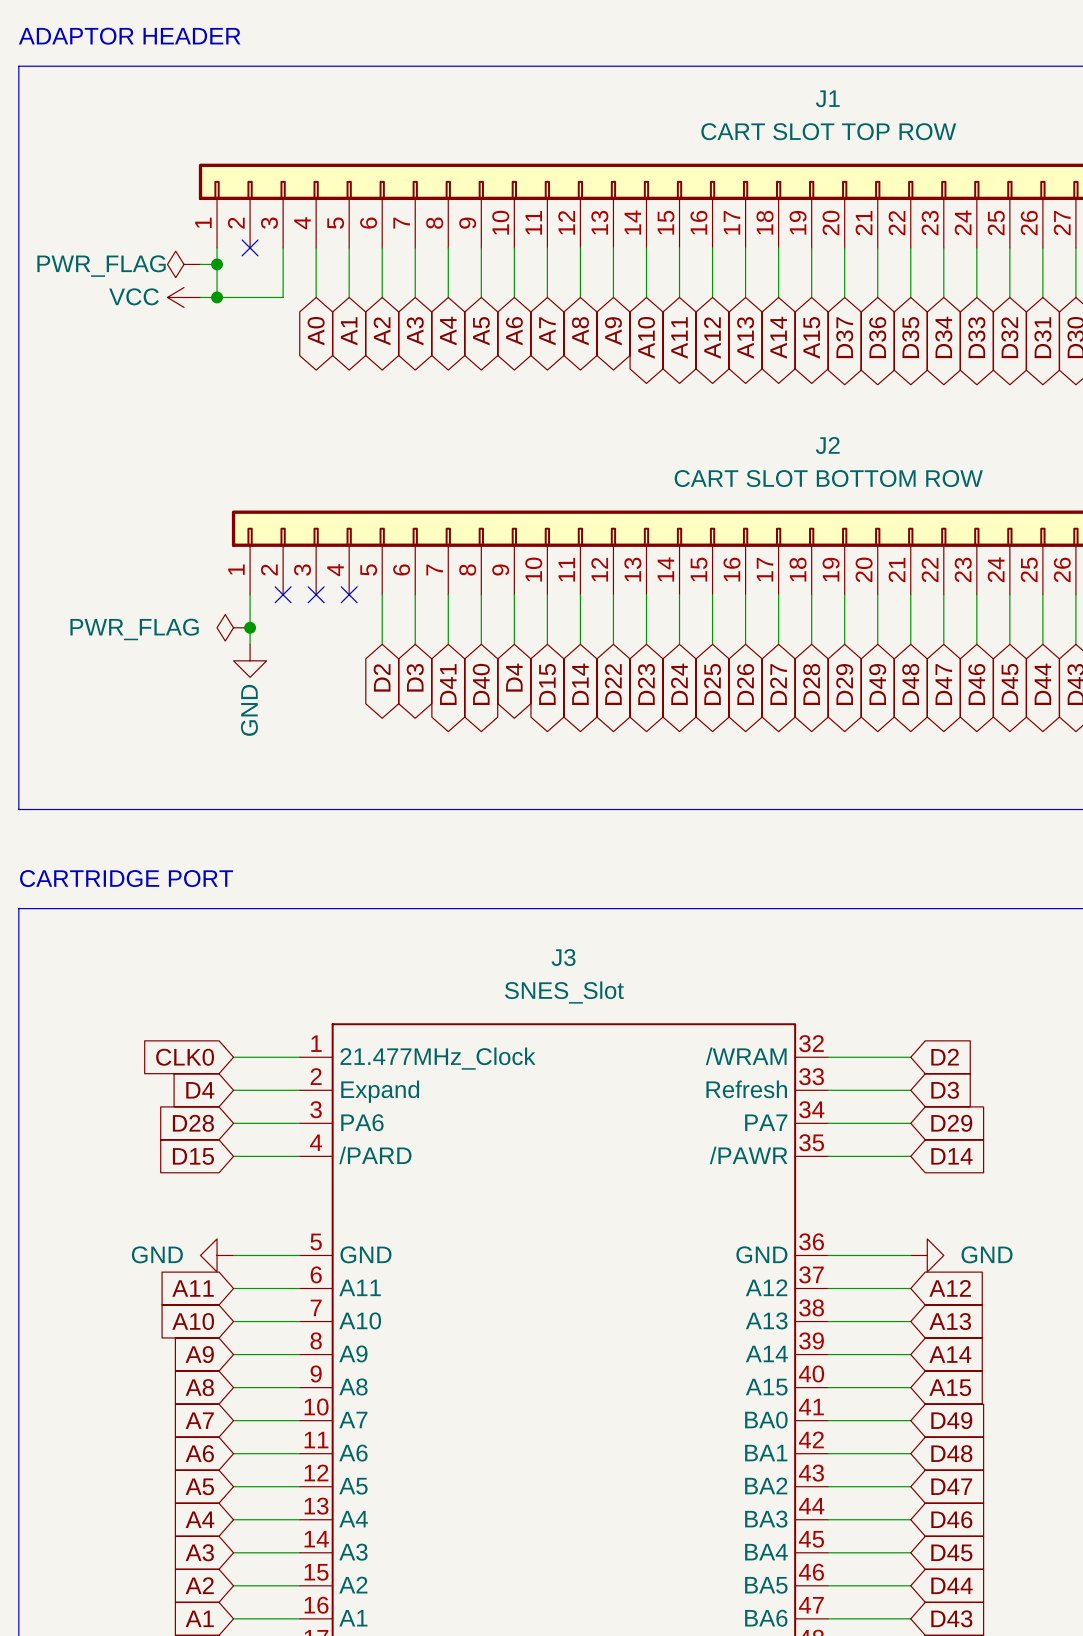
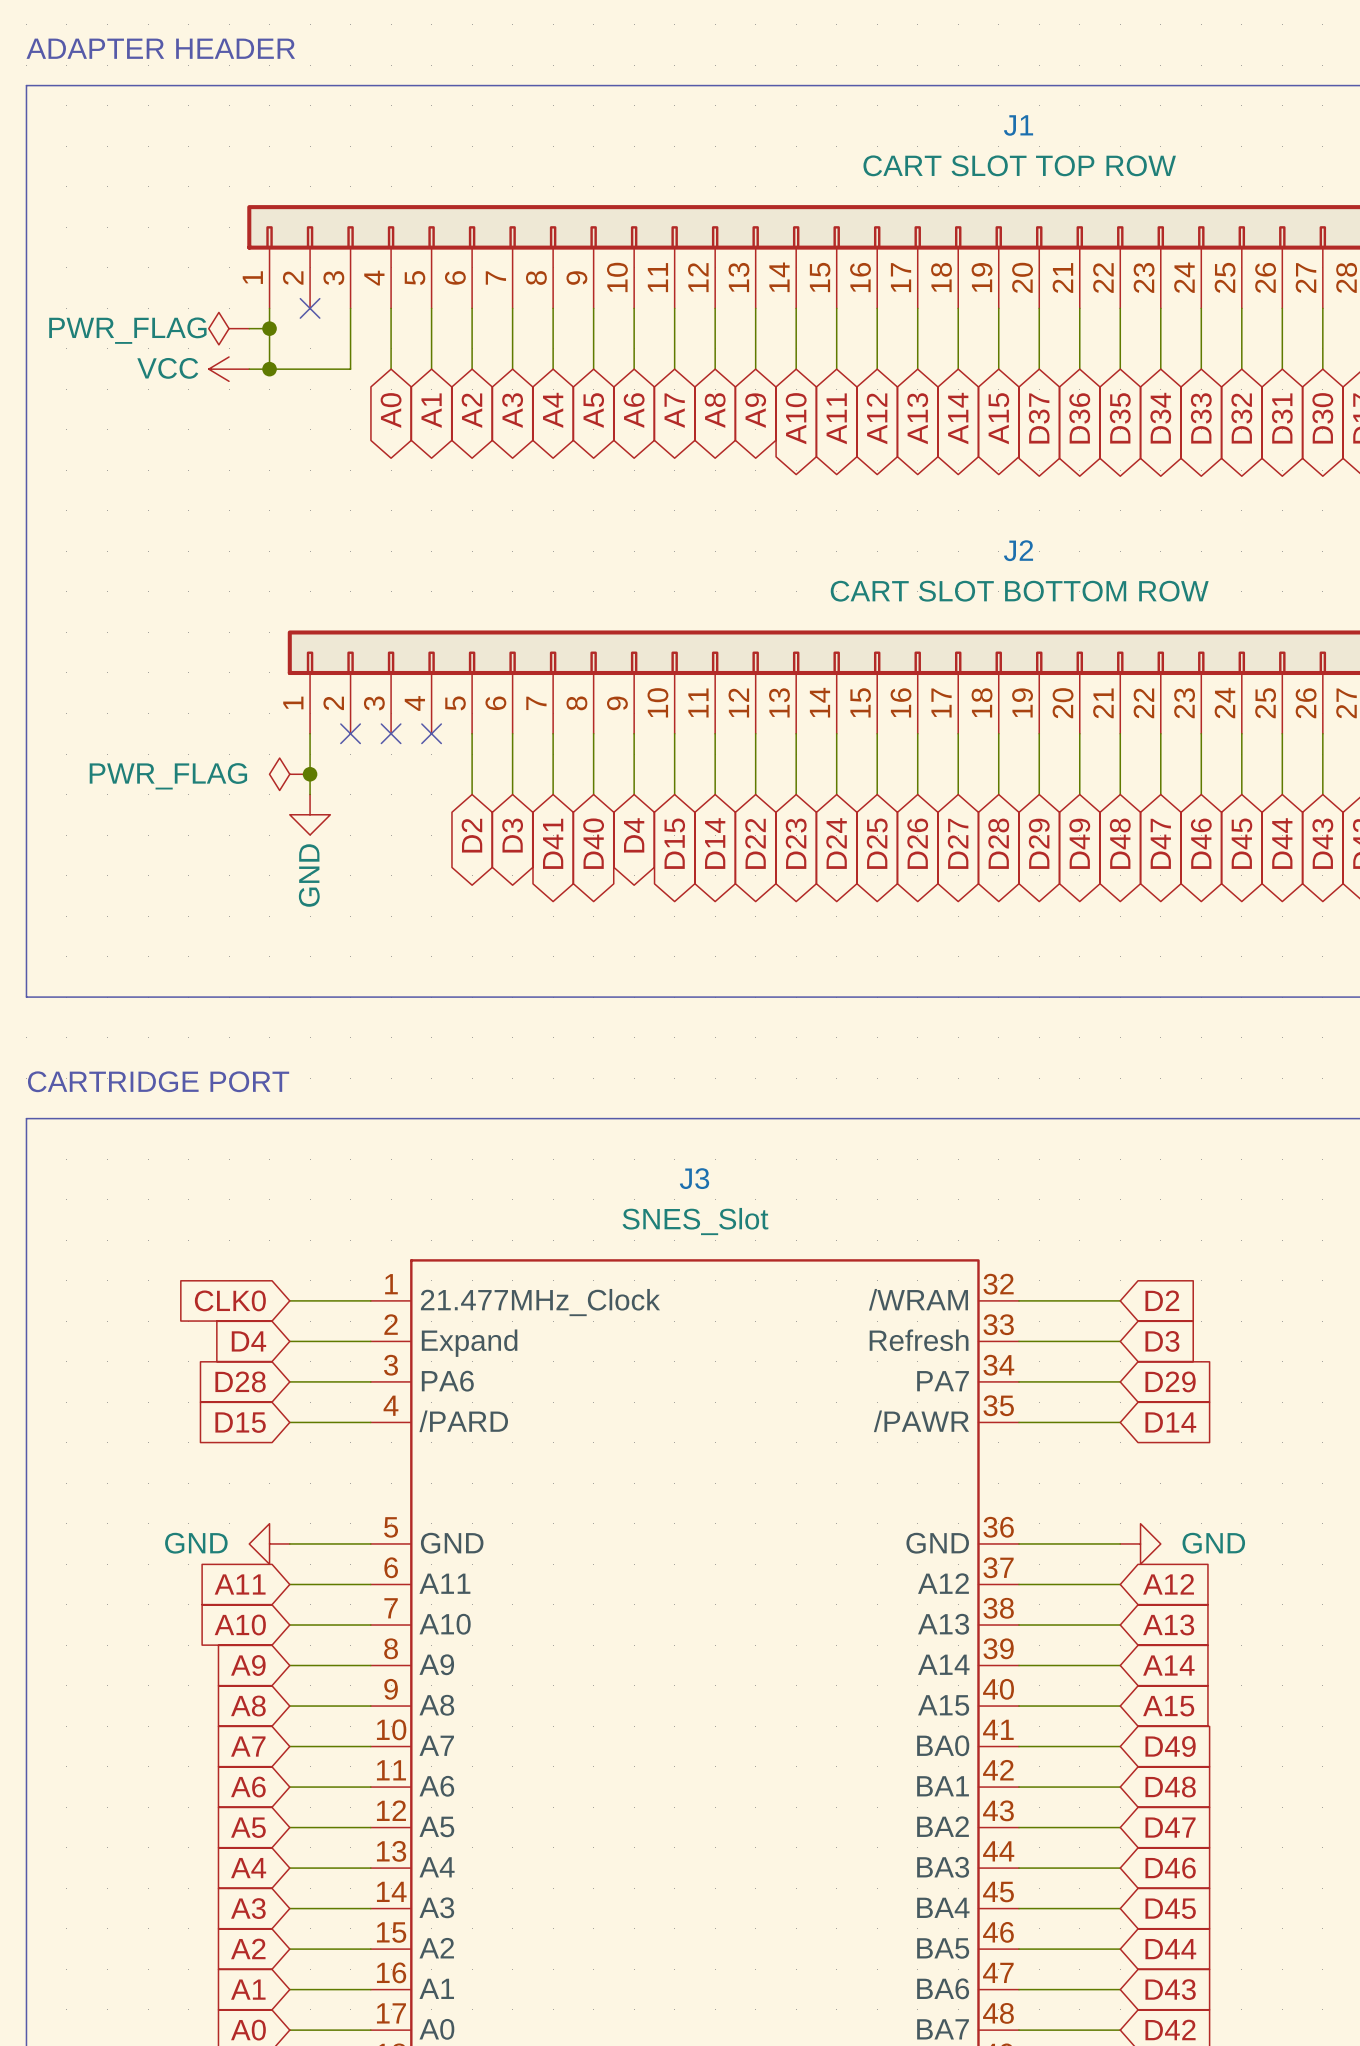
text: ADAPTOR HEADER (129, 36) -> ADAPTER HEADER (160, 48)

